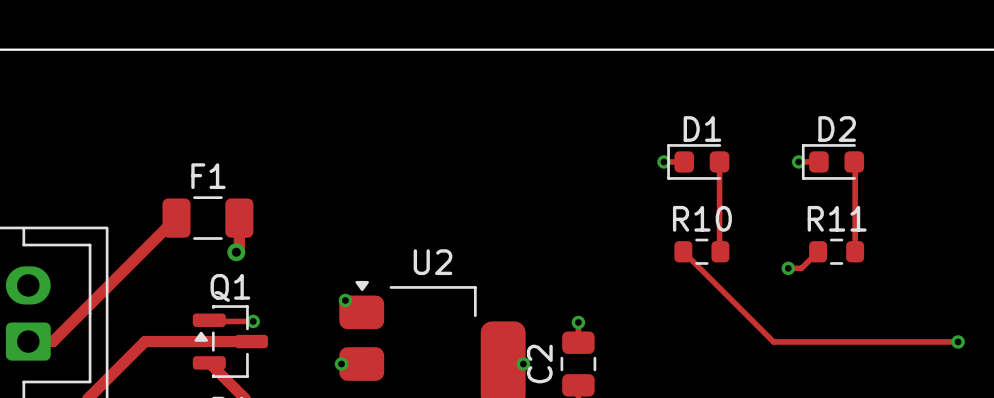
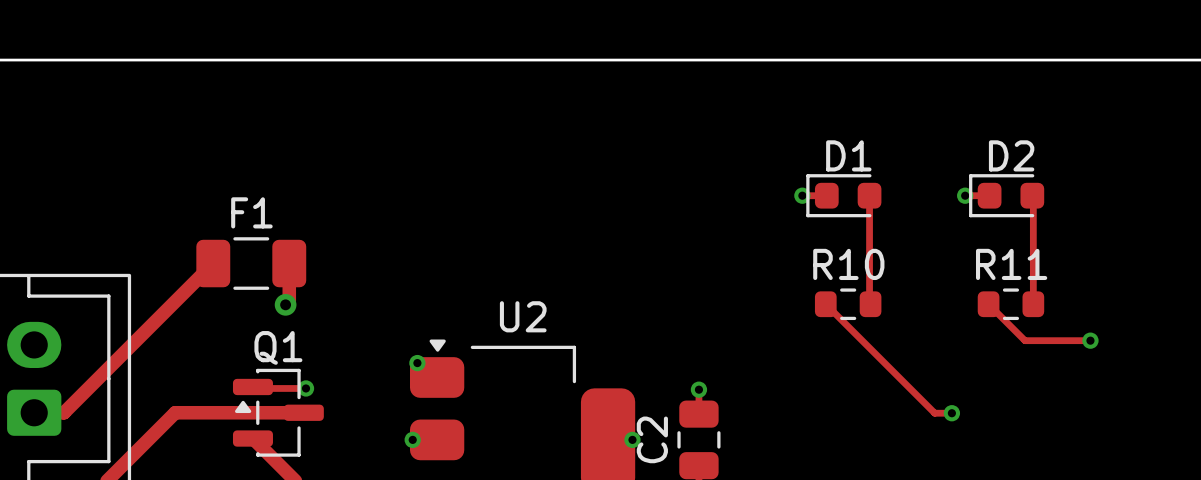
track: (818, 251) (801, 268) (788, 268) -> (988, 304) (1025, 340) (1090, 340)
via: (788, 268) -> none
via: none -> (1090, 340)
track: (787, 341) (958, 341) -> none
via: none -> (951, 413)
via: (958, 341) -> none

